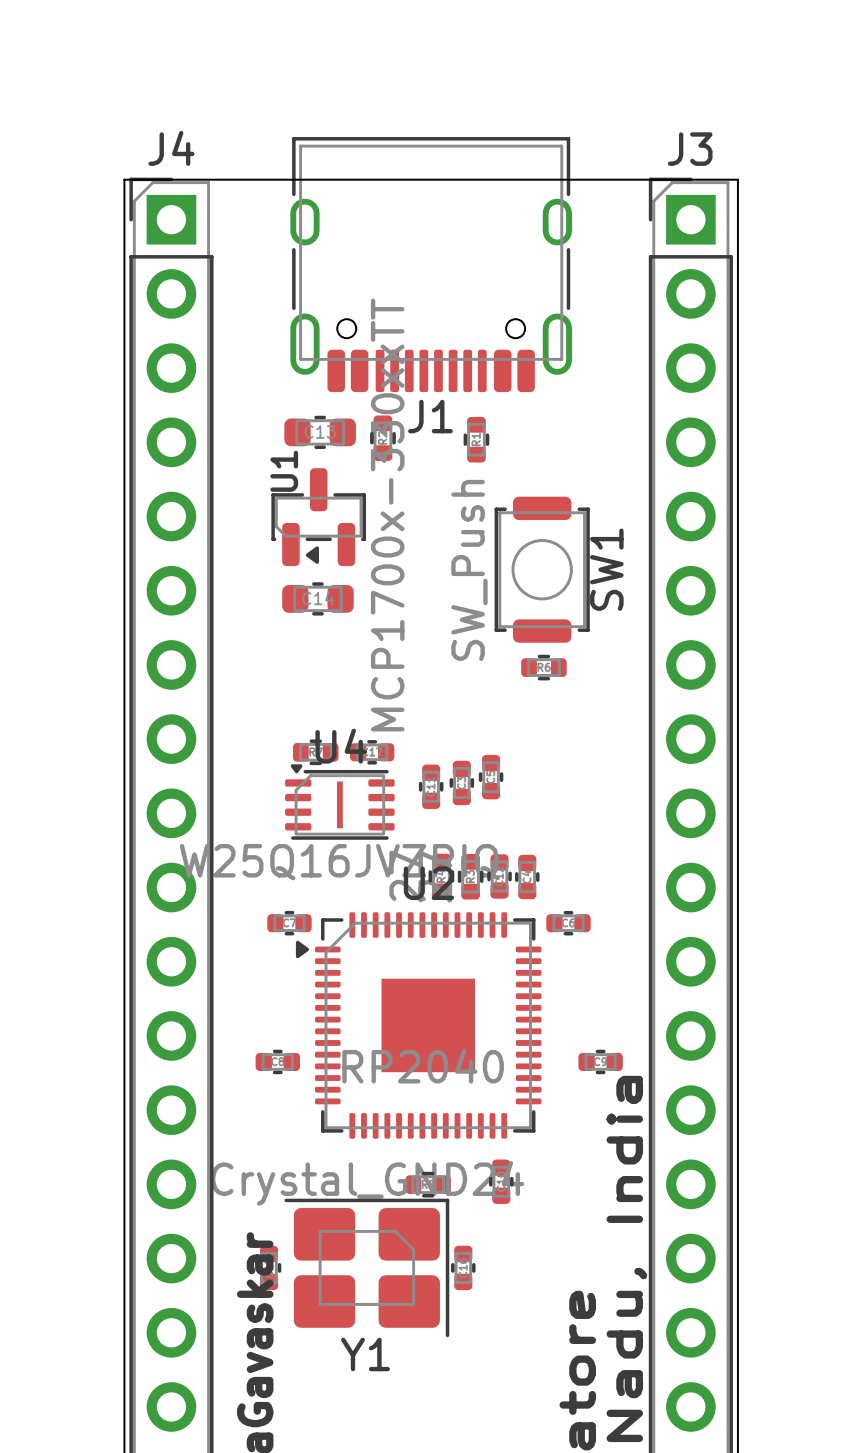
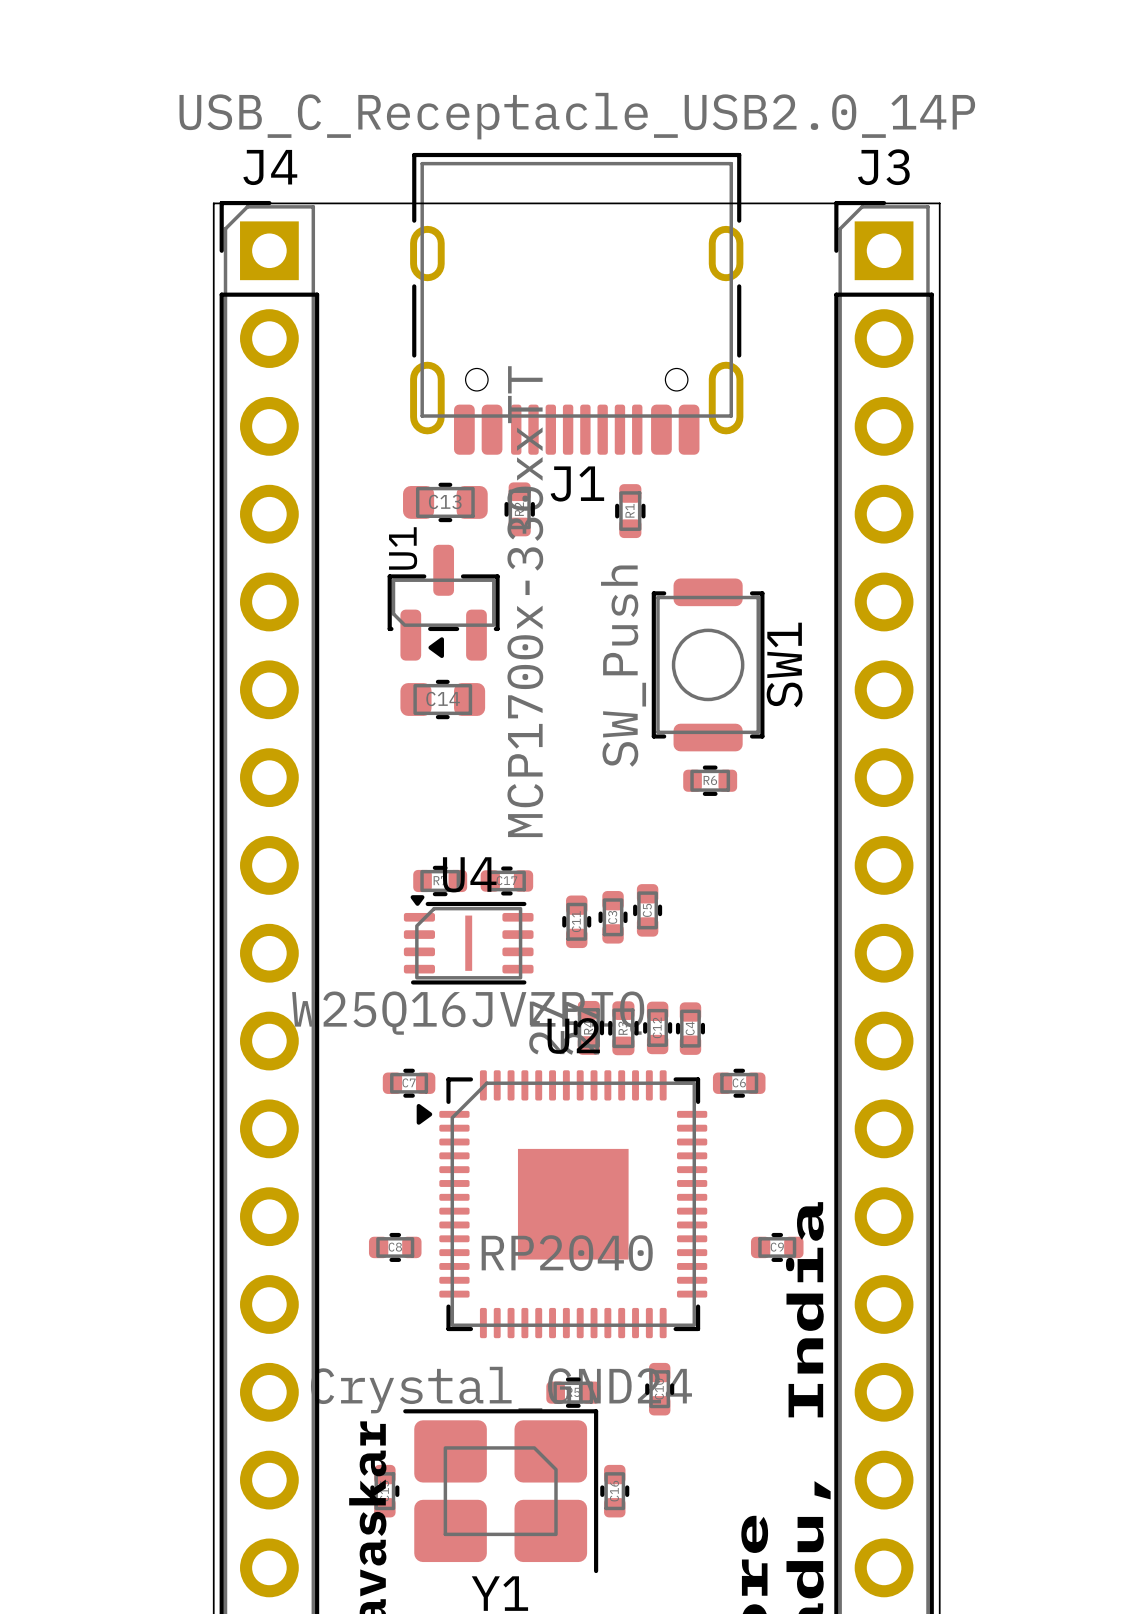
J1 value: none -> USB_C_Receptacle_USB2.0_14P (577, 116)

